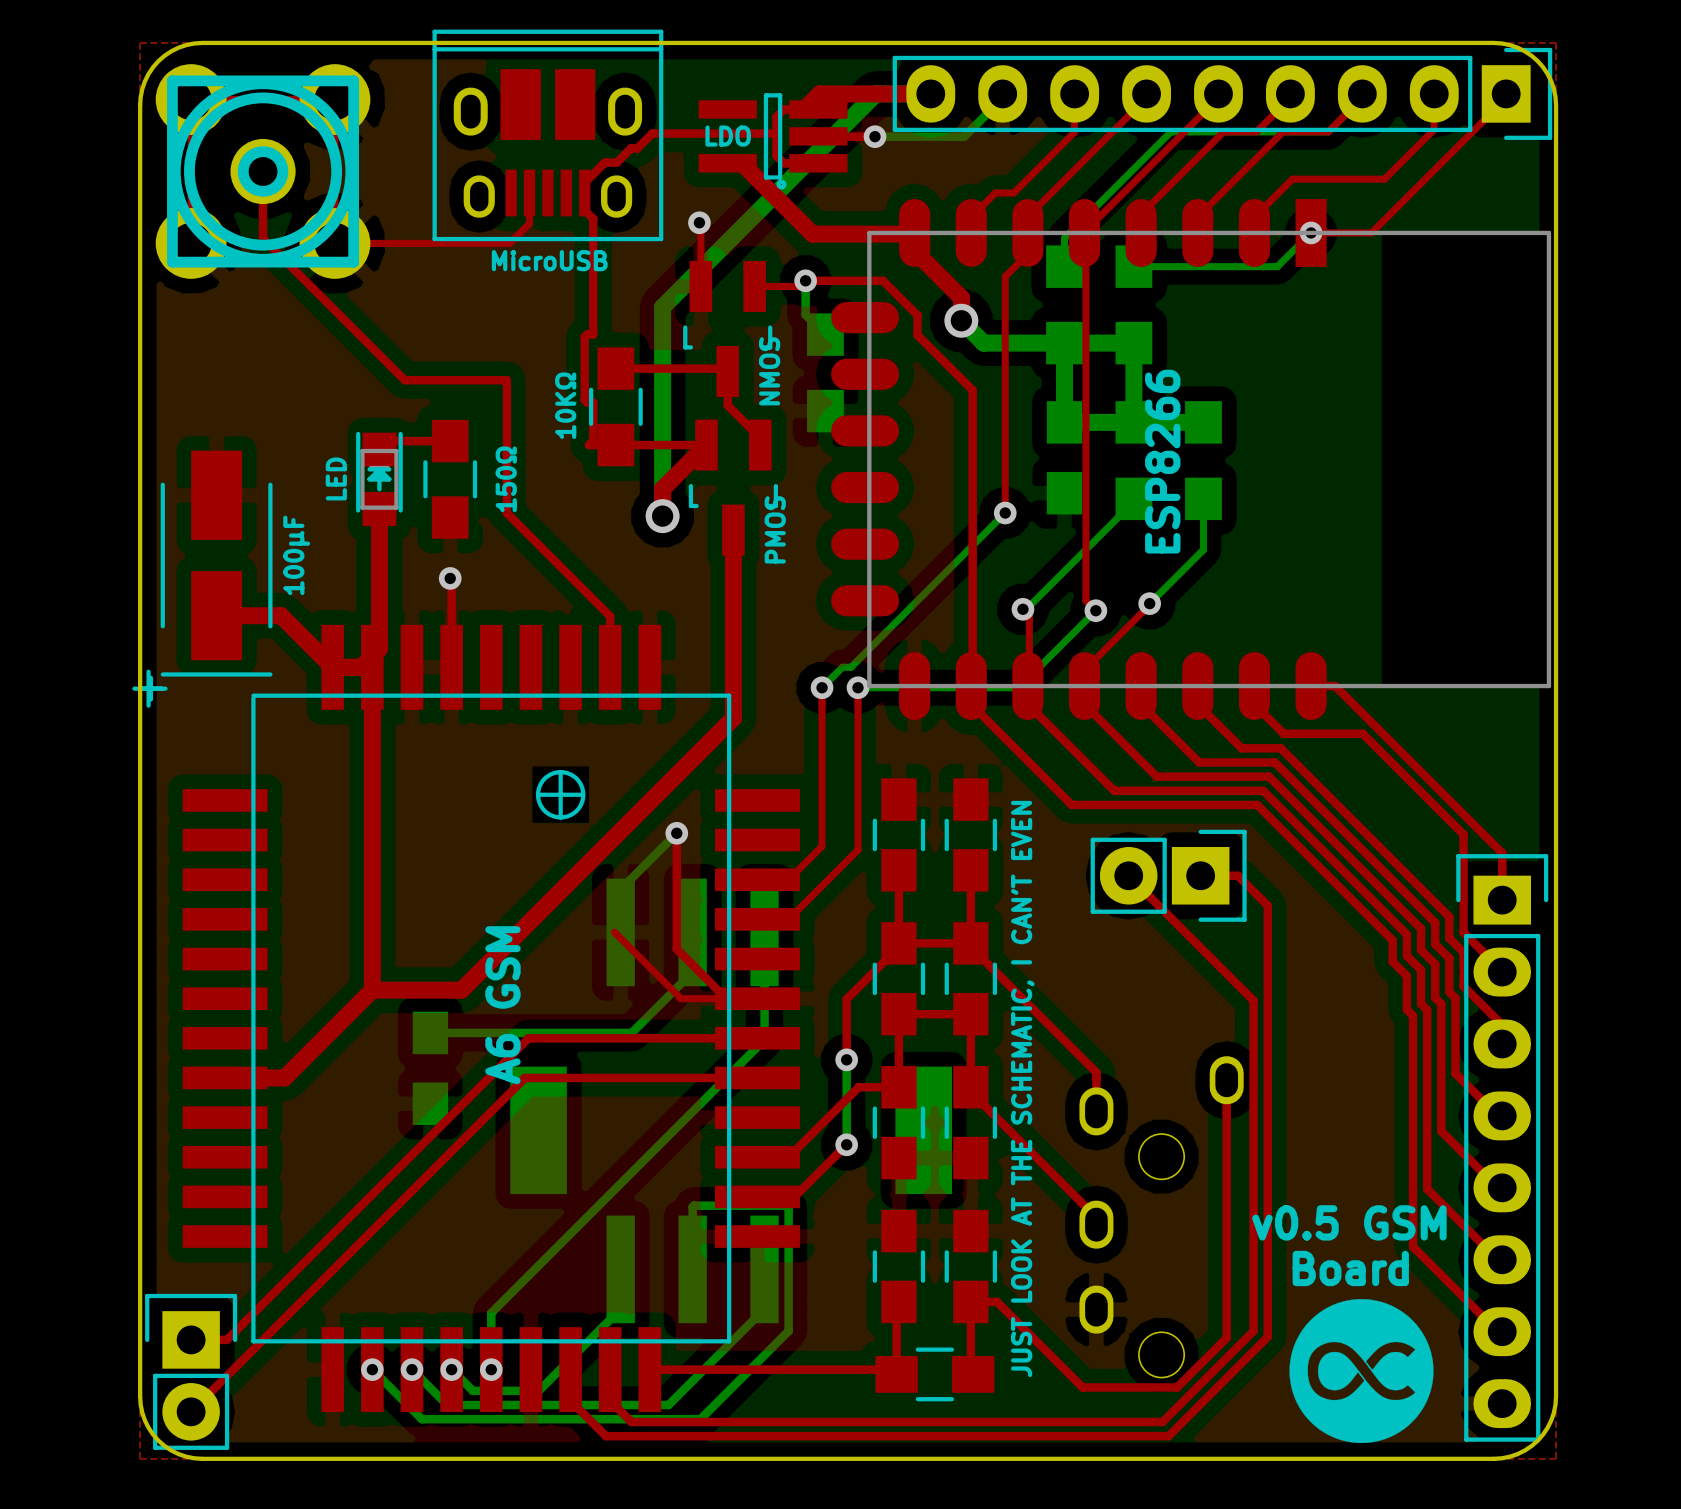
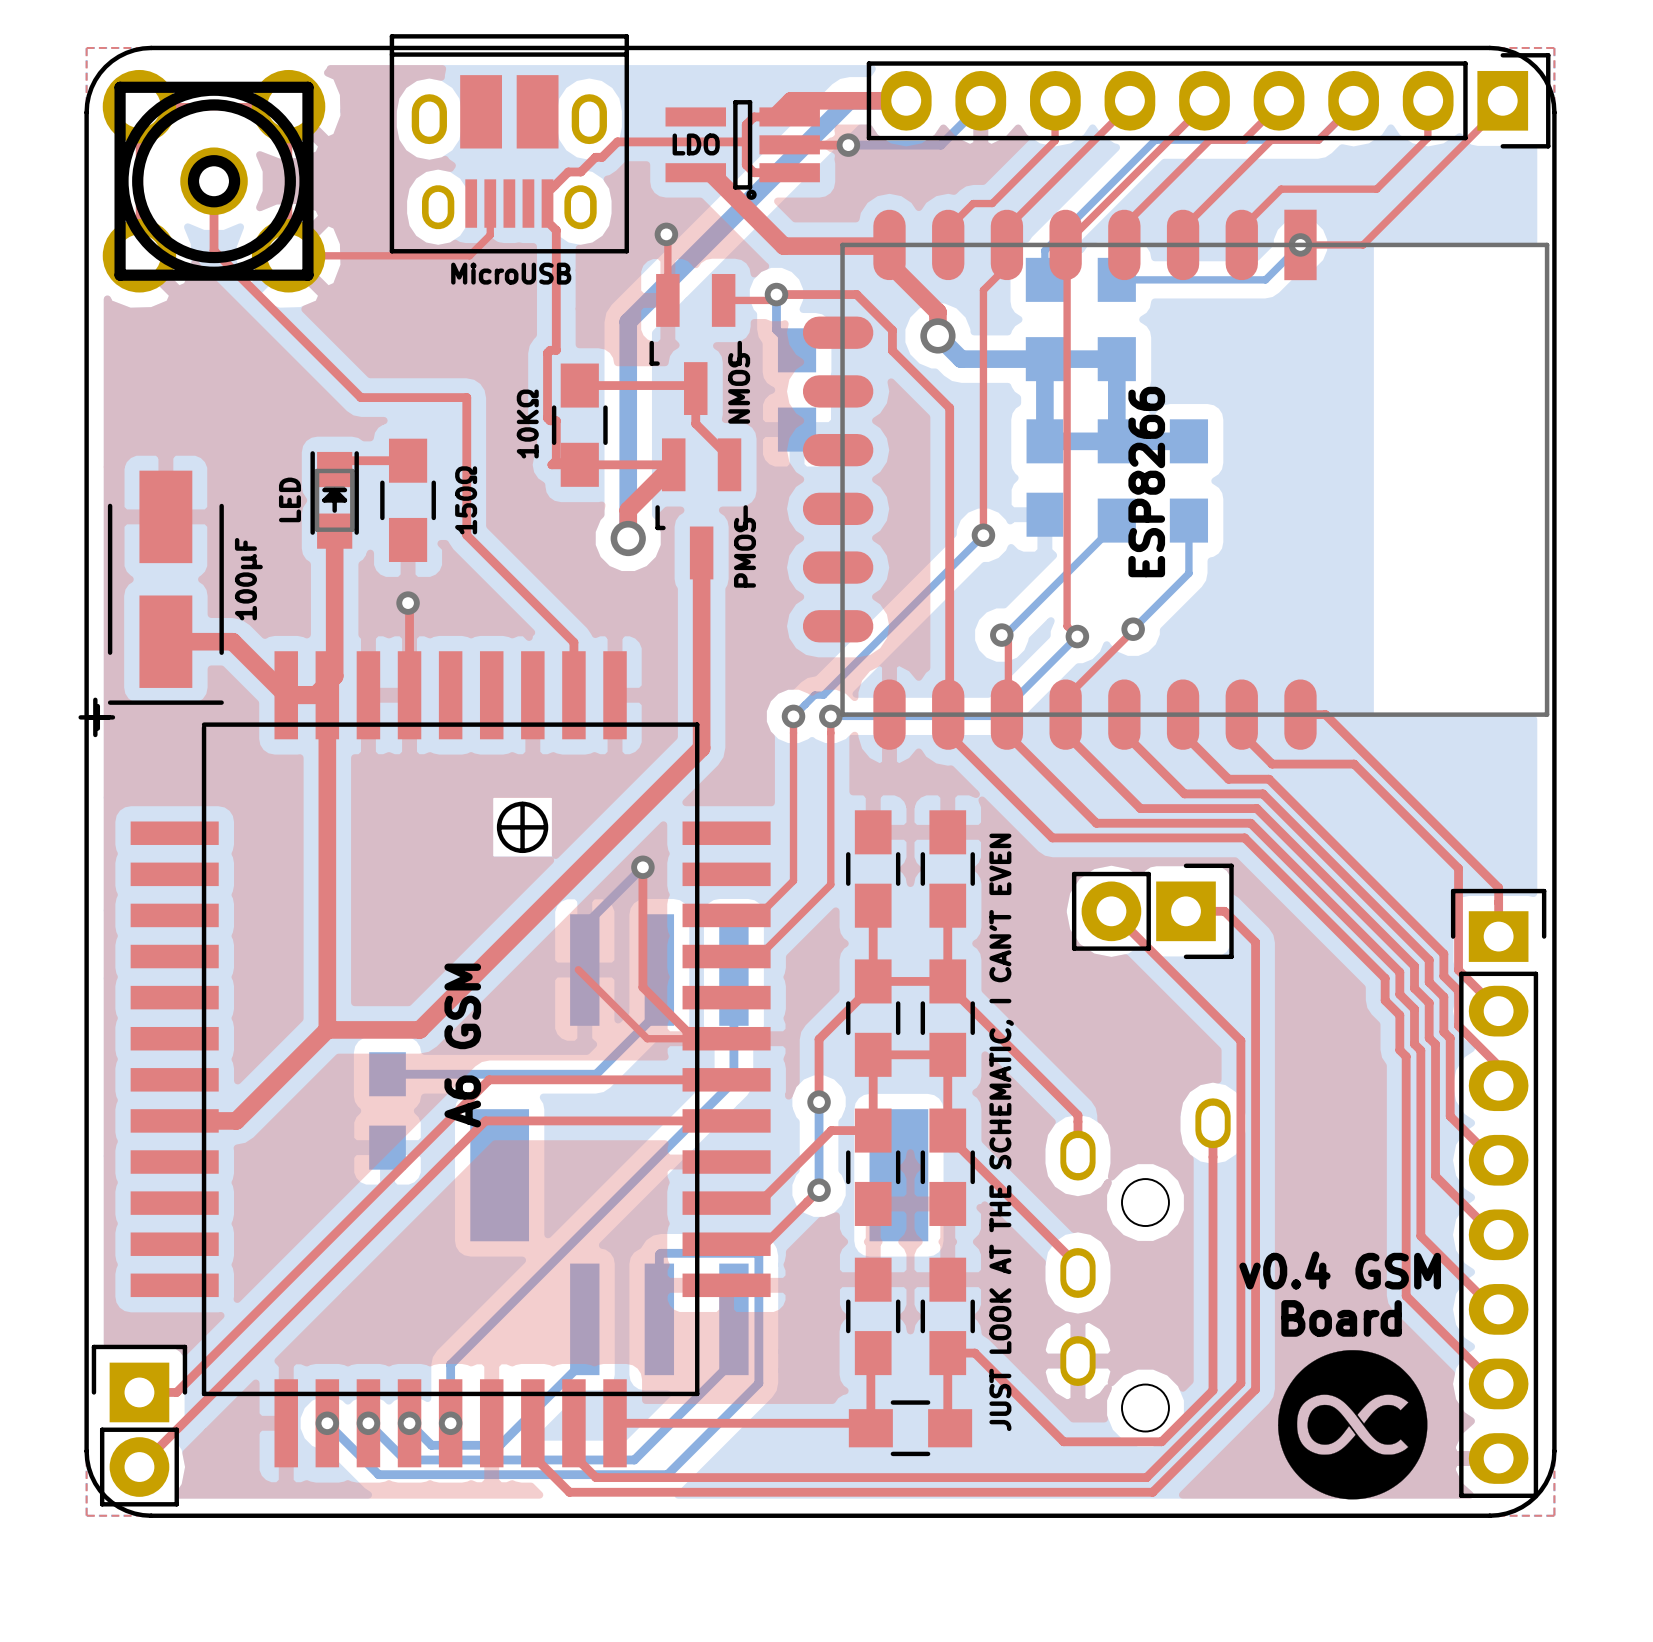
text: v0.5 GSM (1349, 1222) -> v0.4 GSM (1340, 1270)

